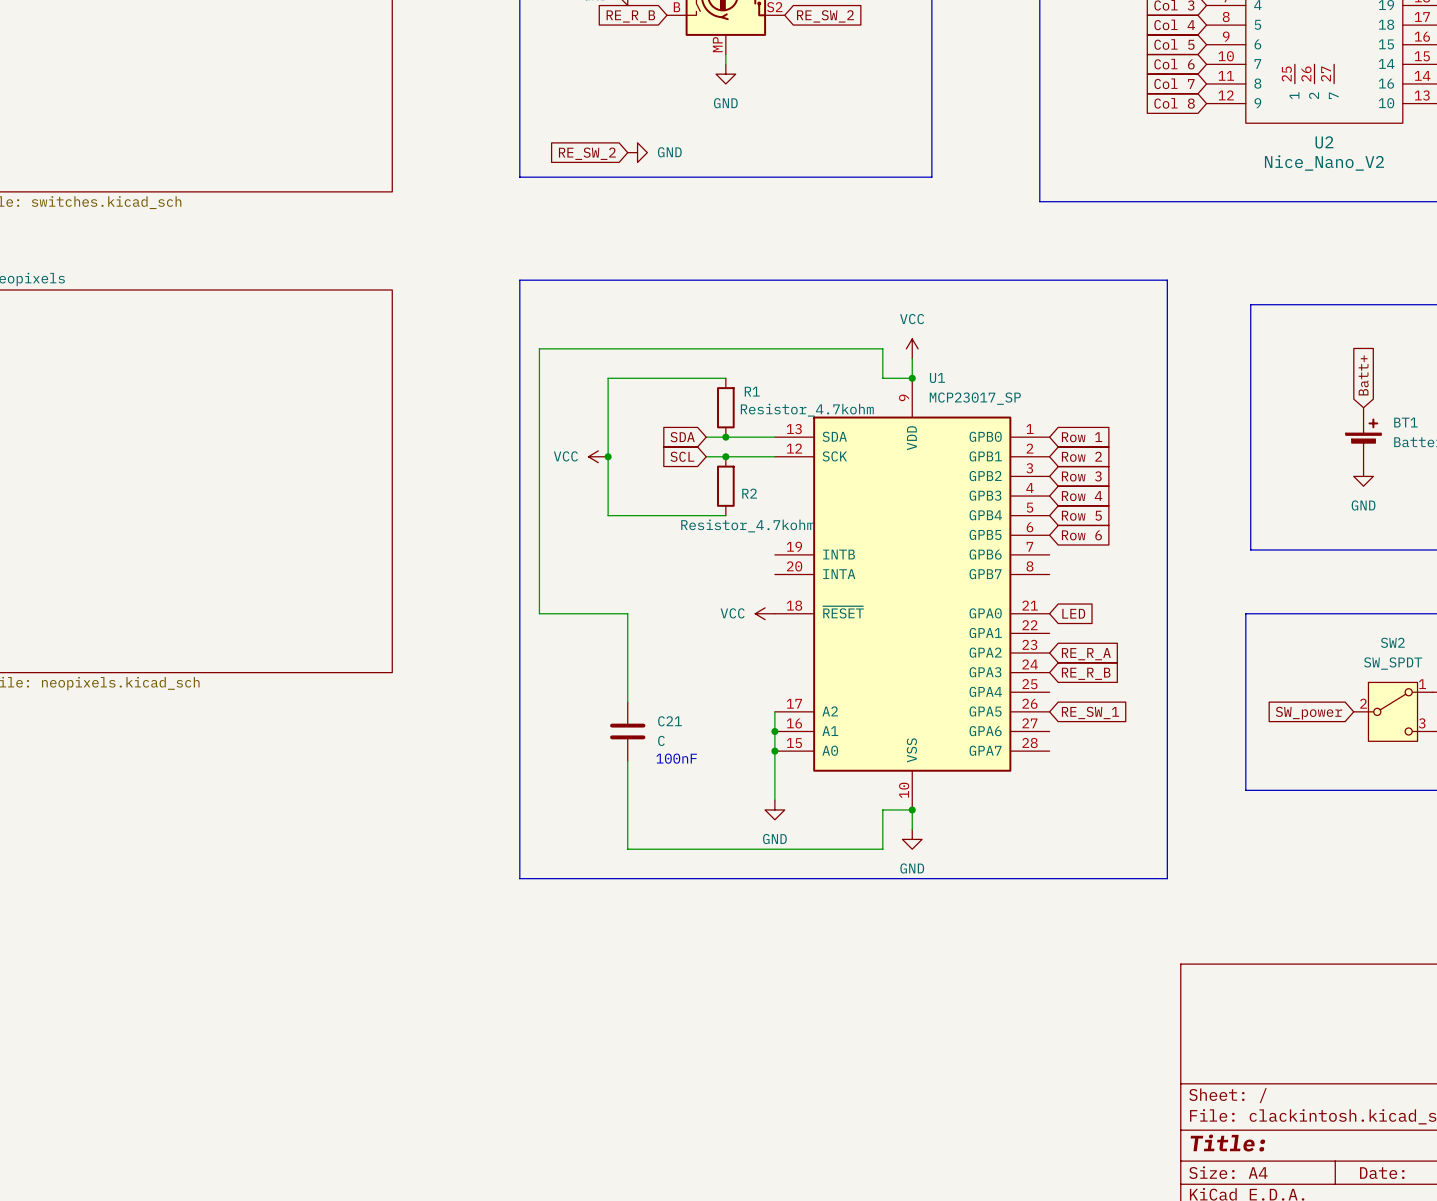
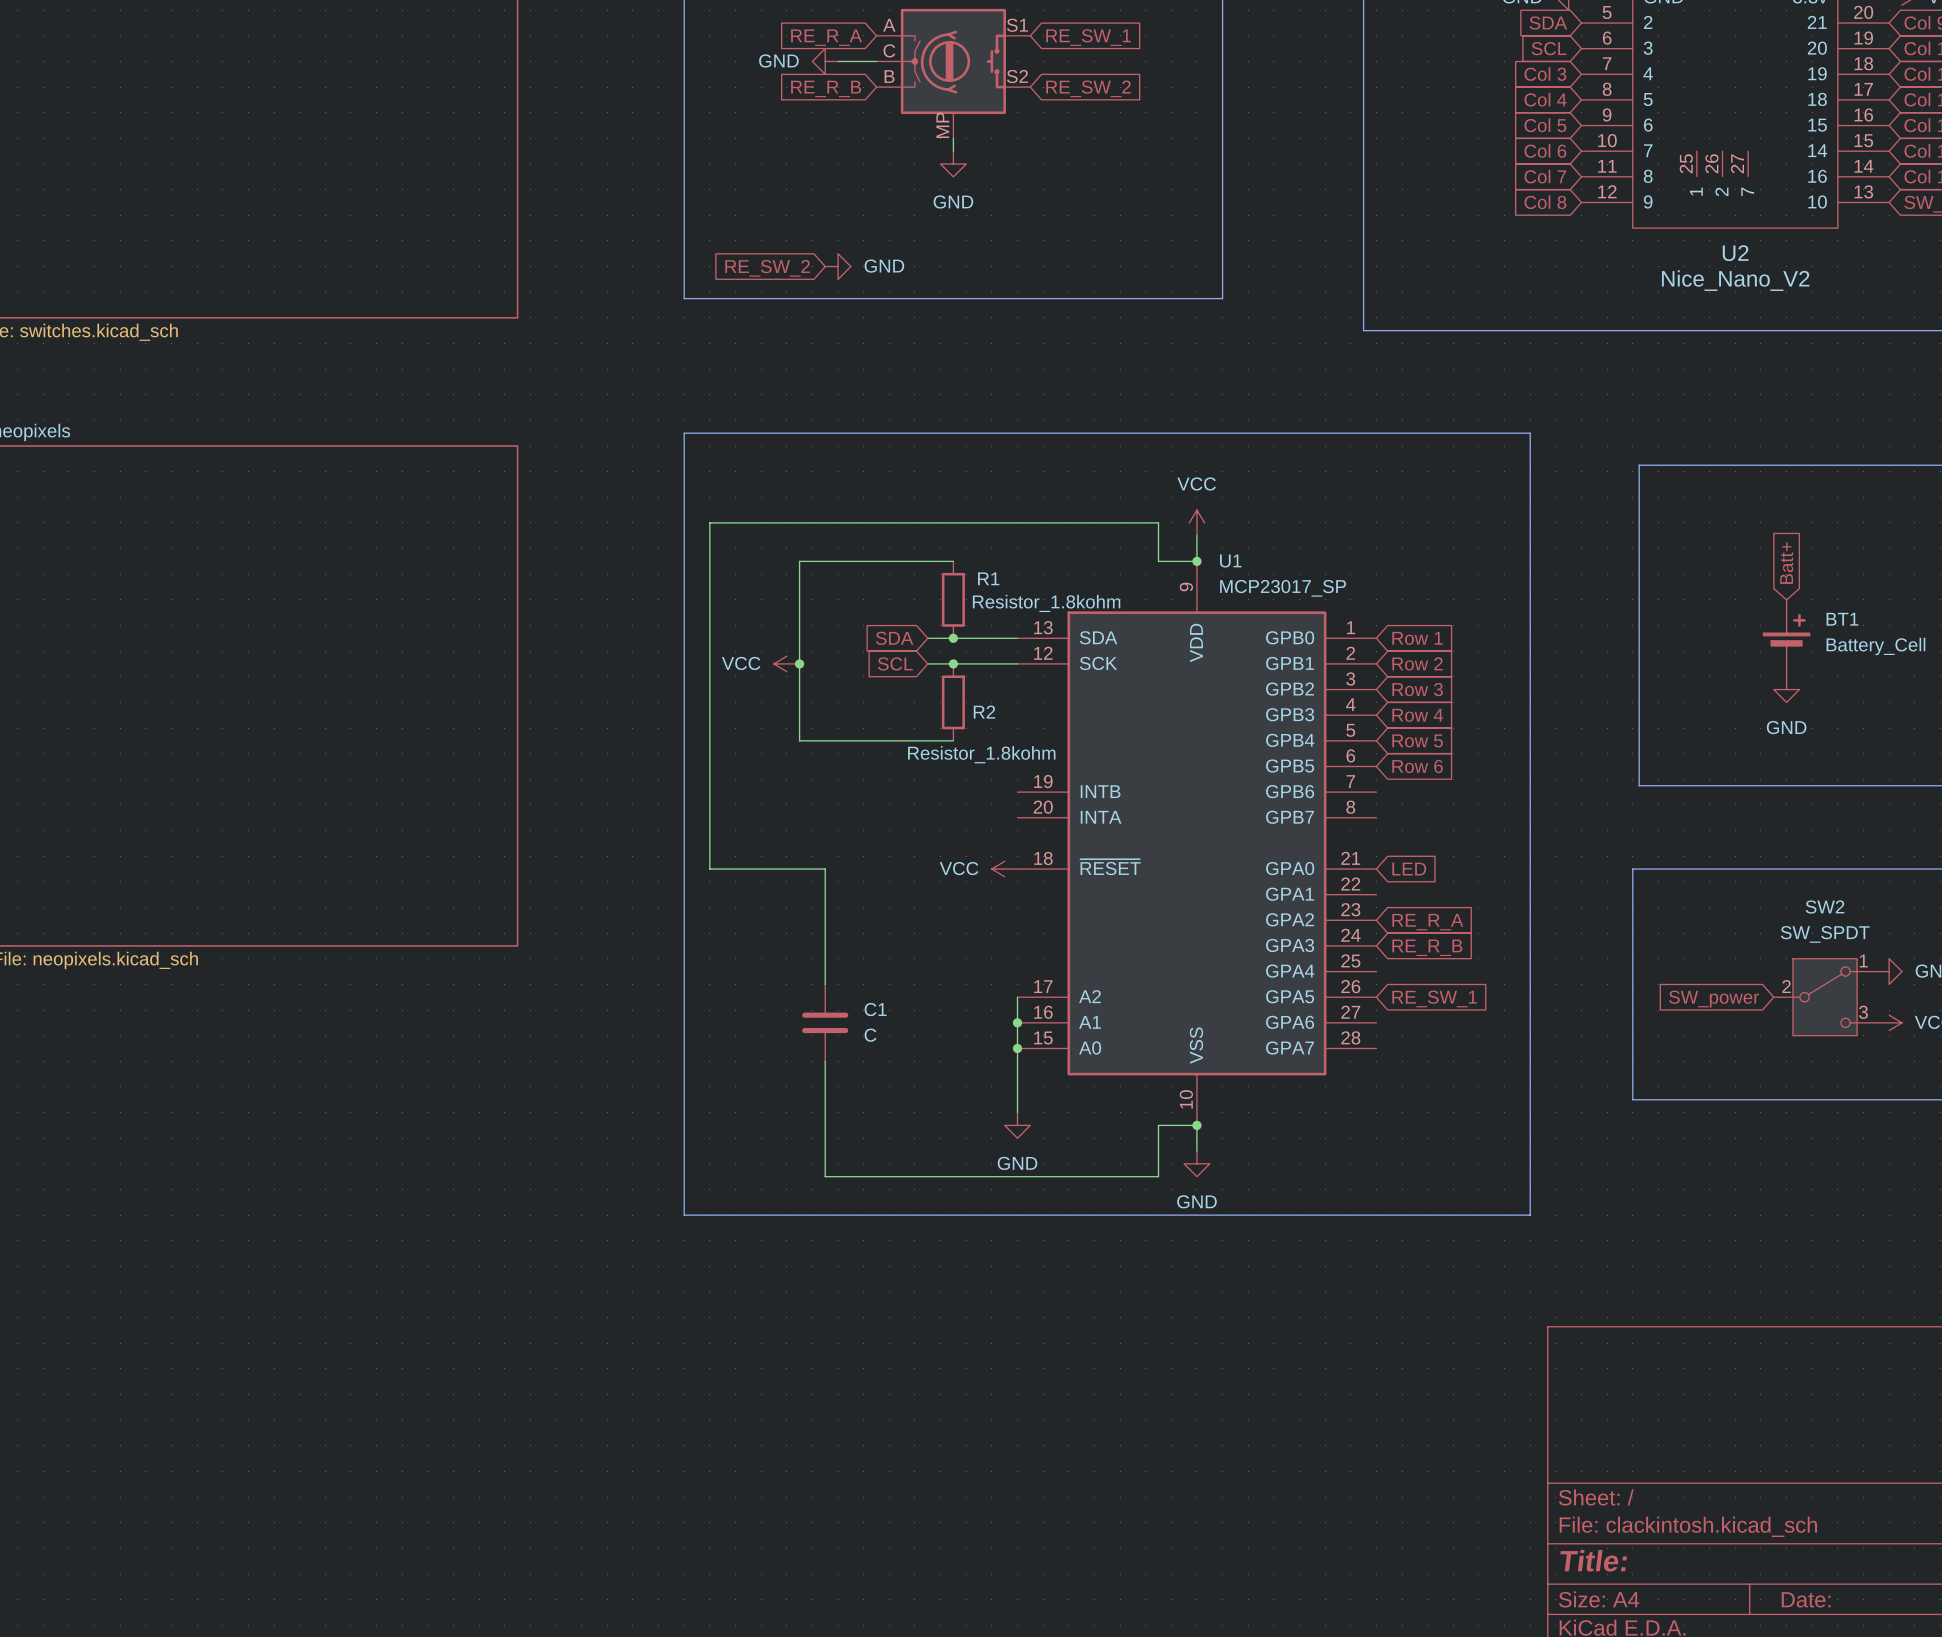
R1 value: Resistor_4.7kohm (807, 410) -> Resistor_1.8kohm (1046, 603)
R2 value: Resistor_4.7kohm (747, 525) -> Resistor_1.8kohm (981, 754)
C21 name: C21 (669, 721) -> C1 (875, 1009)
text: 100nF (676, 758) -> none

